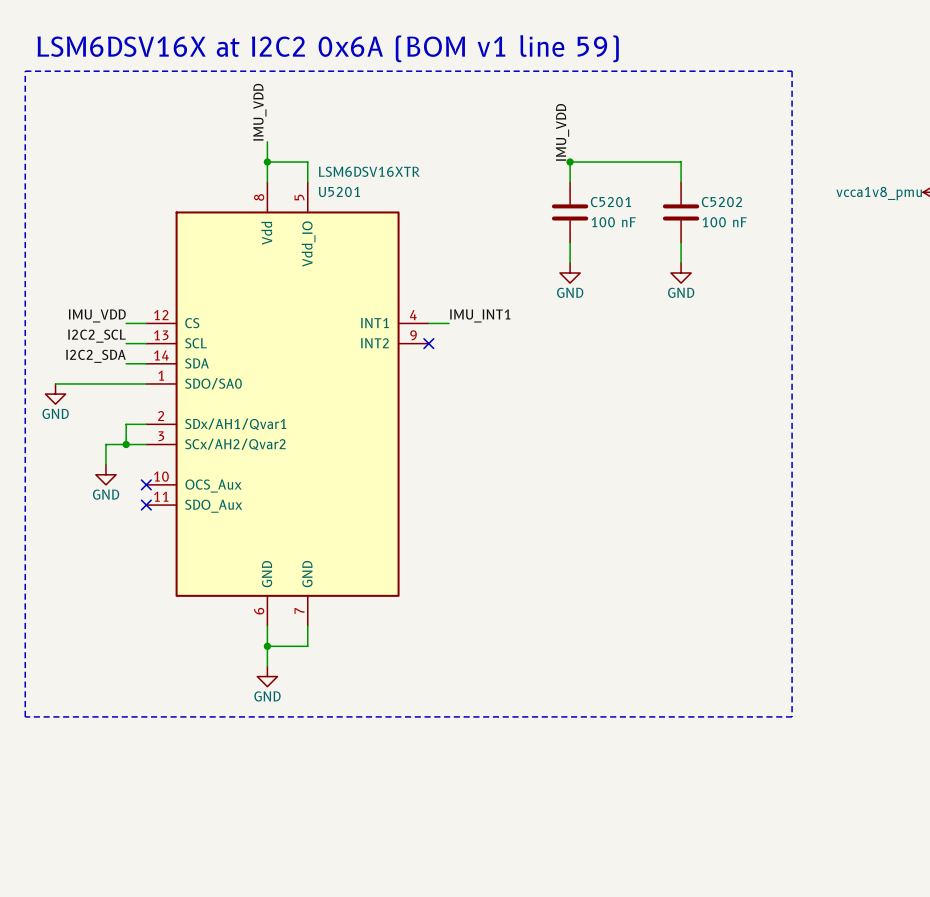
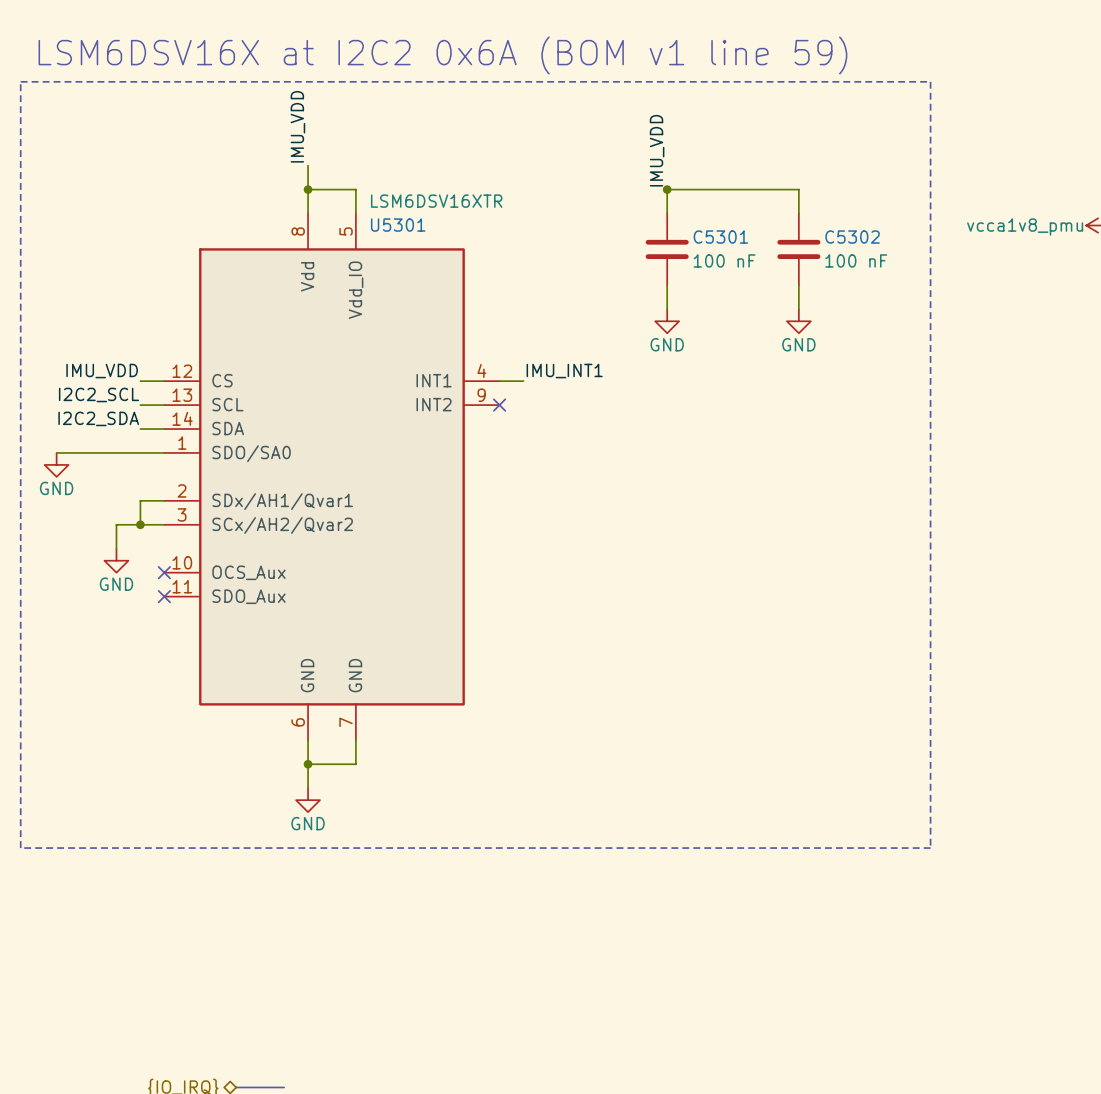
U5201 name: U5201 (339, 191) -> U5301 (398, 225)
C5201 name: C5201 (610, 202) -> C5301 (720, 237)
C5202 name: C5202 (721, 202) -> C5302 (852, 237)

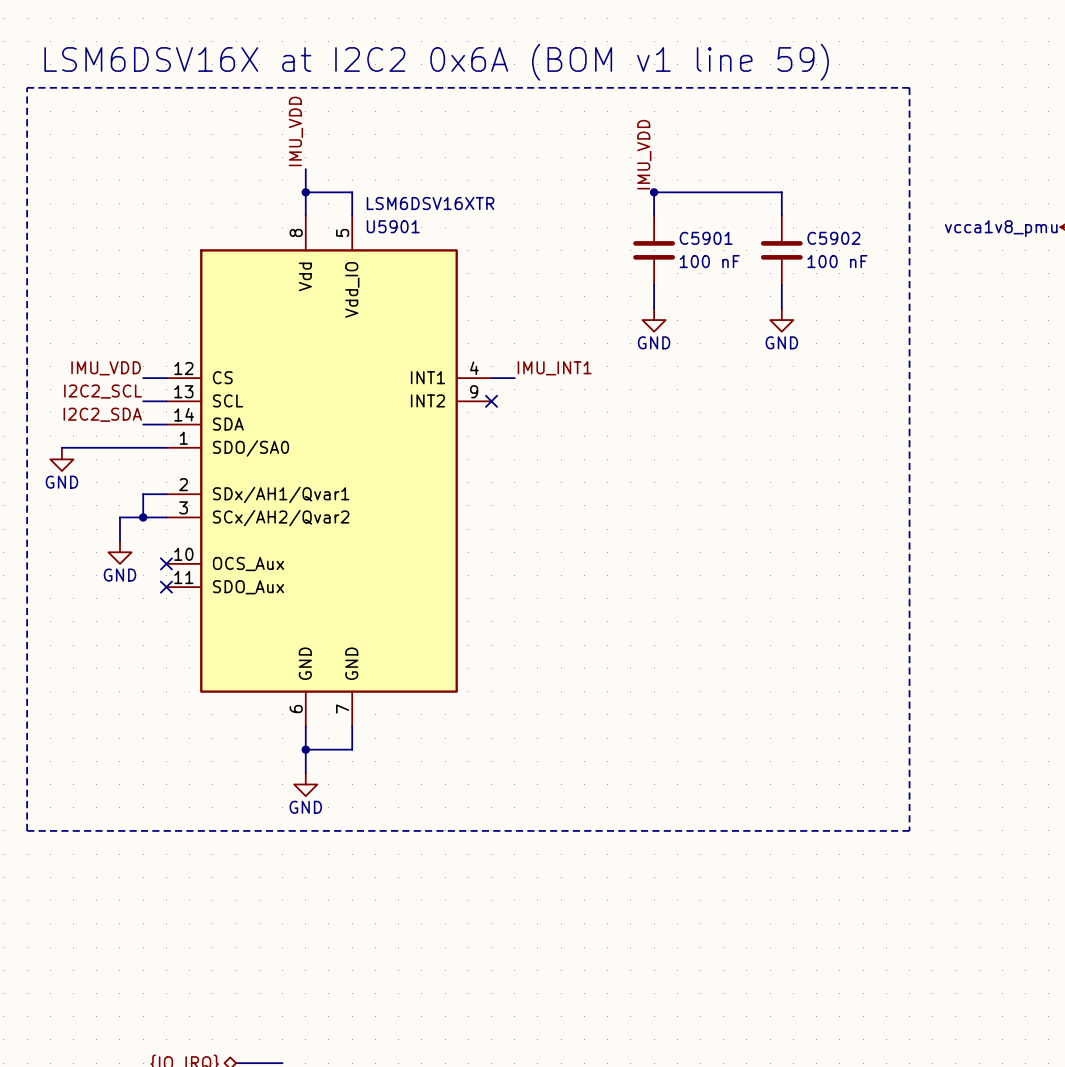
U5301 name: U5301 (398, 225) -> U5901 (393, 226)
C5301 name: C5301 (720, 237) -> C5901 (706, 238)
C5302 name: C5302 (852, 237) -> C5902 (833, 238)

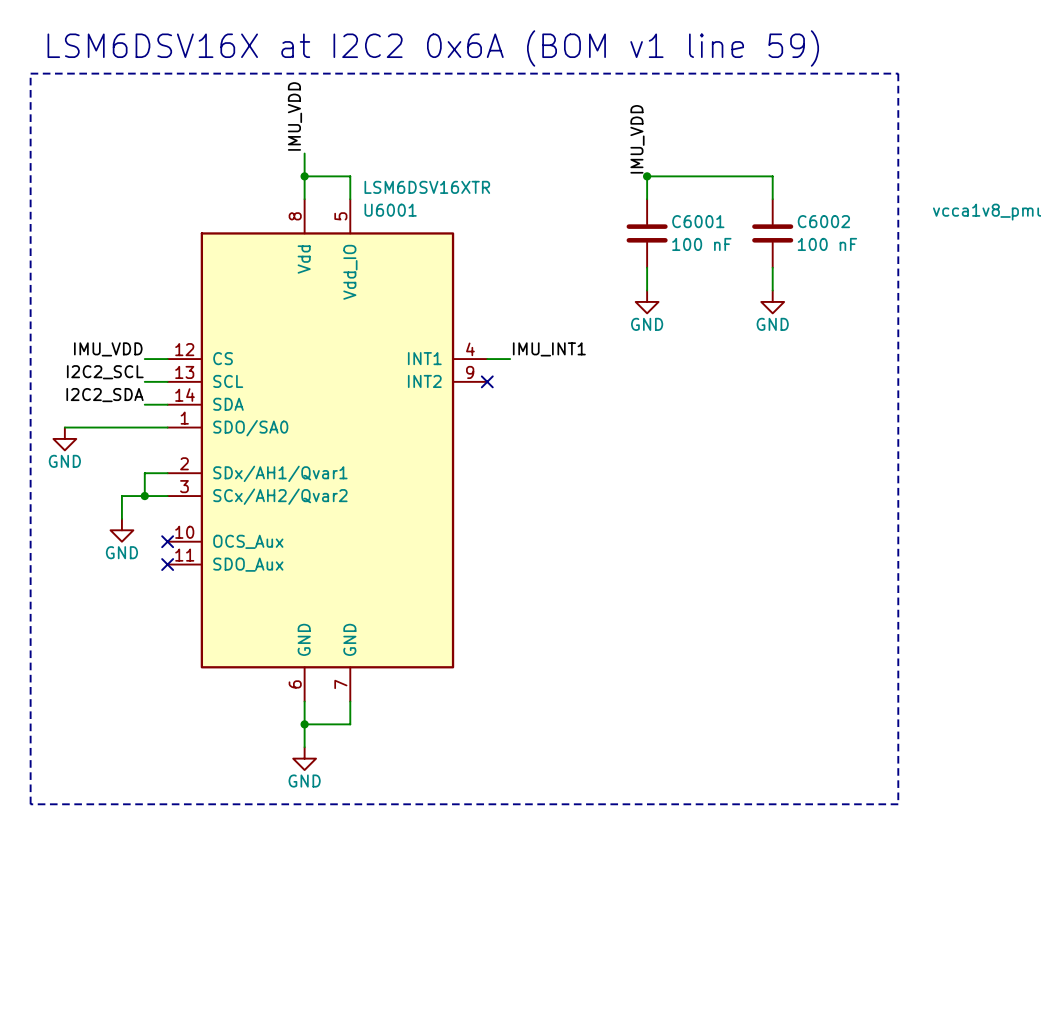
U5901 name: U5901 (393, 226) -> U6001 (390, 210)
C5901 name: C5901 (706, 238) -> C6001 (698, 221)
C5902 name: C5902 (833, 238) -> C6002 (823, 221)

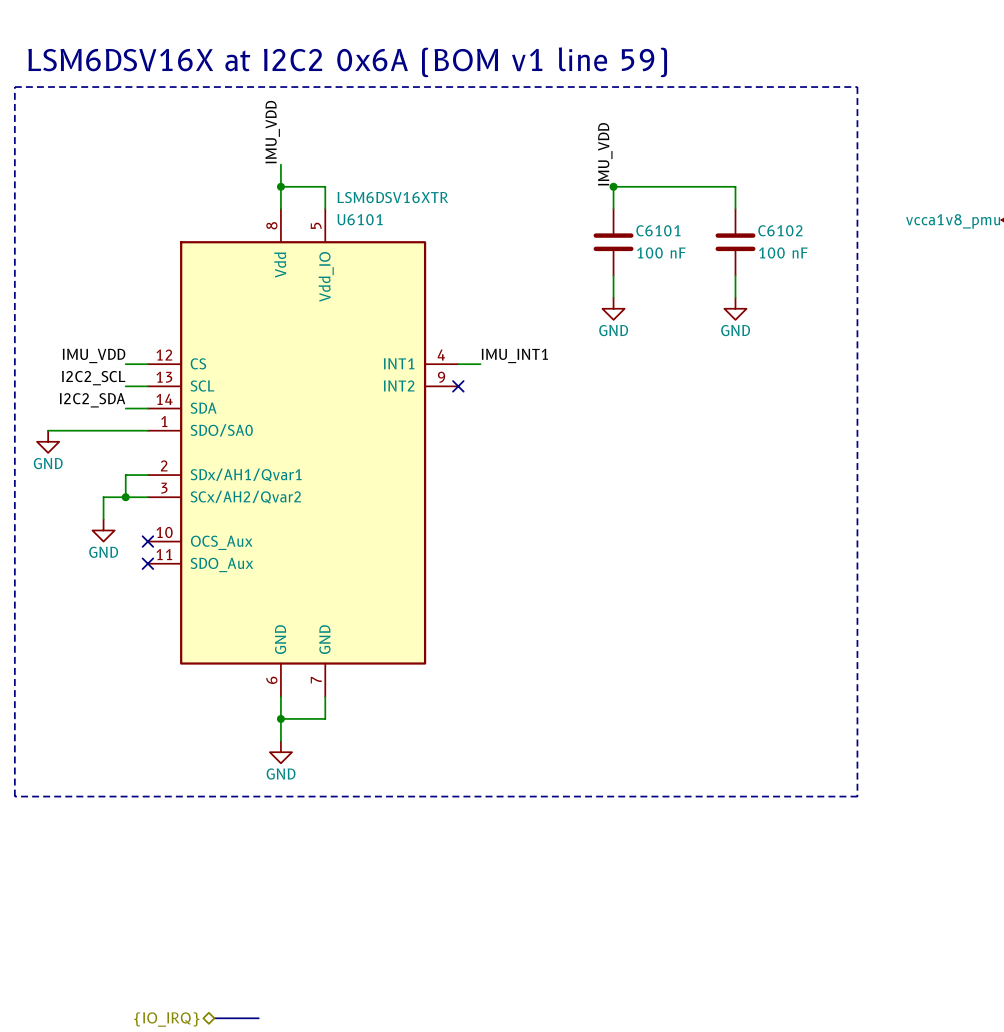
U6001 name: U6001 (390, 210) -> U6101 (360, 219)
C6001 name: C6001 (698, 221) -> C6101 (658, 230)
C6002 name: C6002 (823, 221) -> C6102 (780, 230)

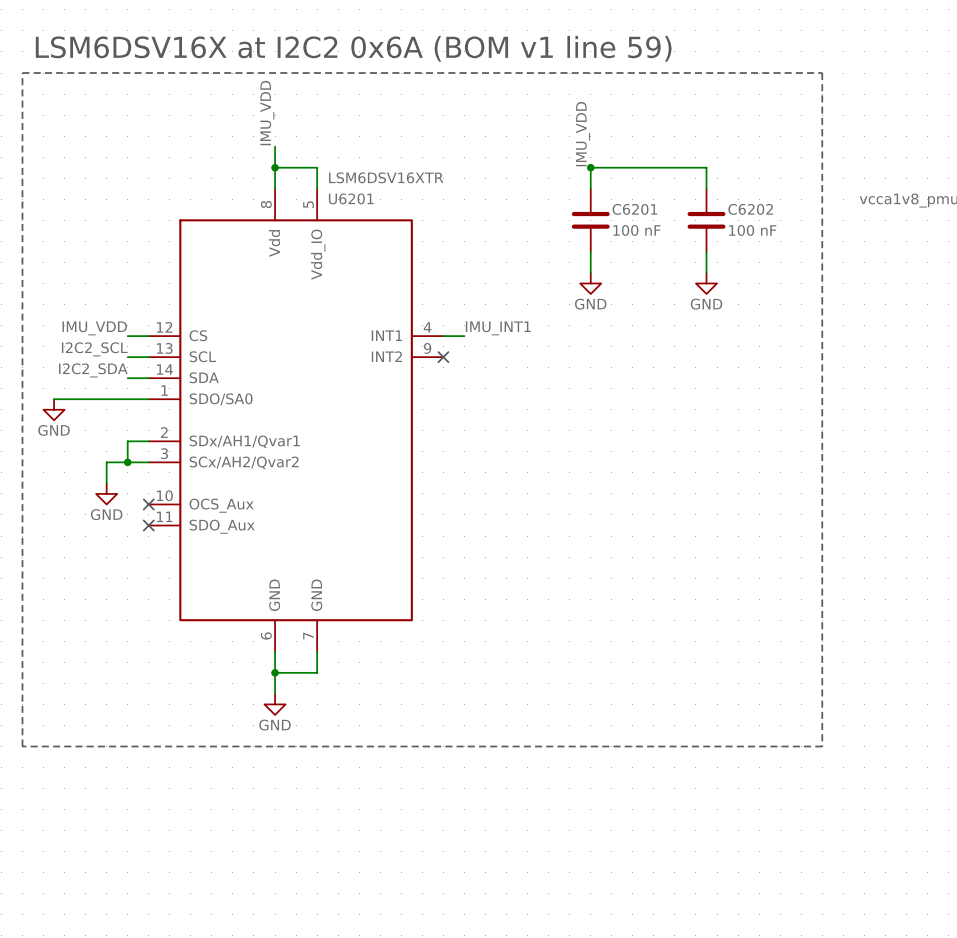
U6101 name: U6101 (360, 219) -> U6201 (351, 198)
C6101 name: C6101 (658, 230) -> C6201 (634, 209)
C6102 name: C6102 (780, 230) -> C6202 (750, 209)

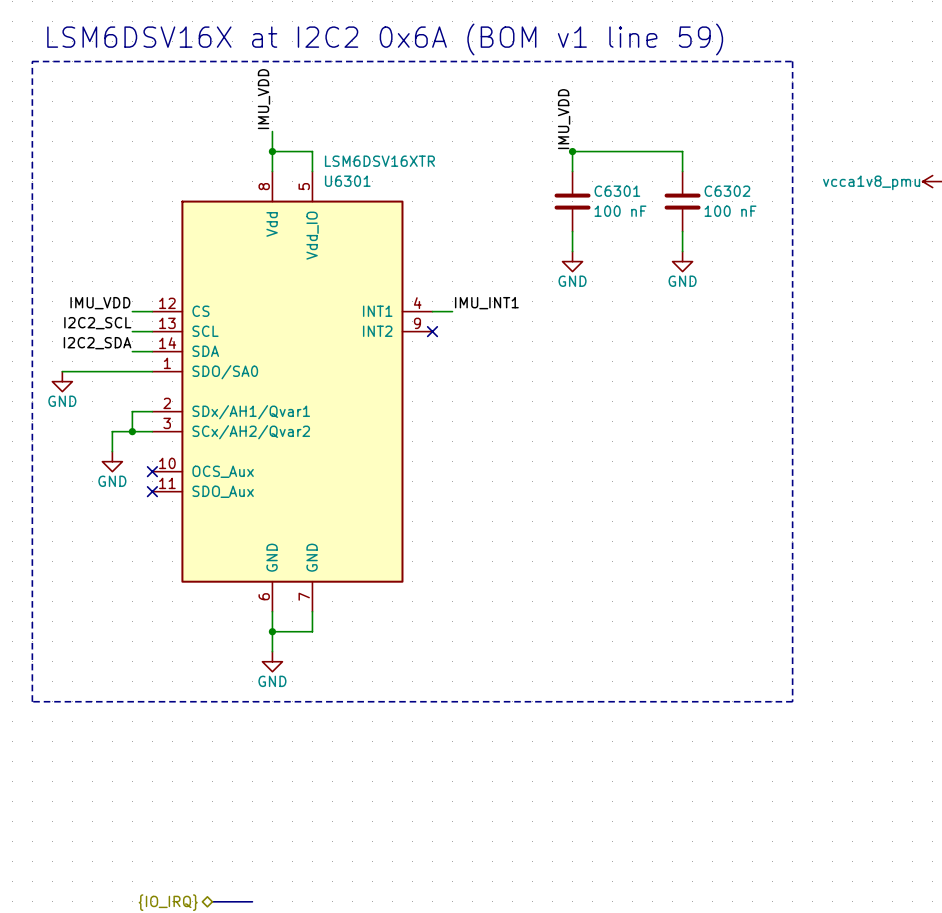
U6201 name: U6201 (351, 198) -> U6301 (347, 181)
C6201 name: C6201 (634, 209) -> C6301 (617, 191)
C6202 name: C6202 (750, 209) -> C6302 (727, 191)

